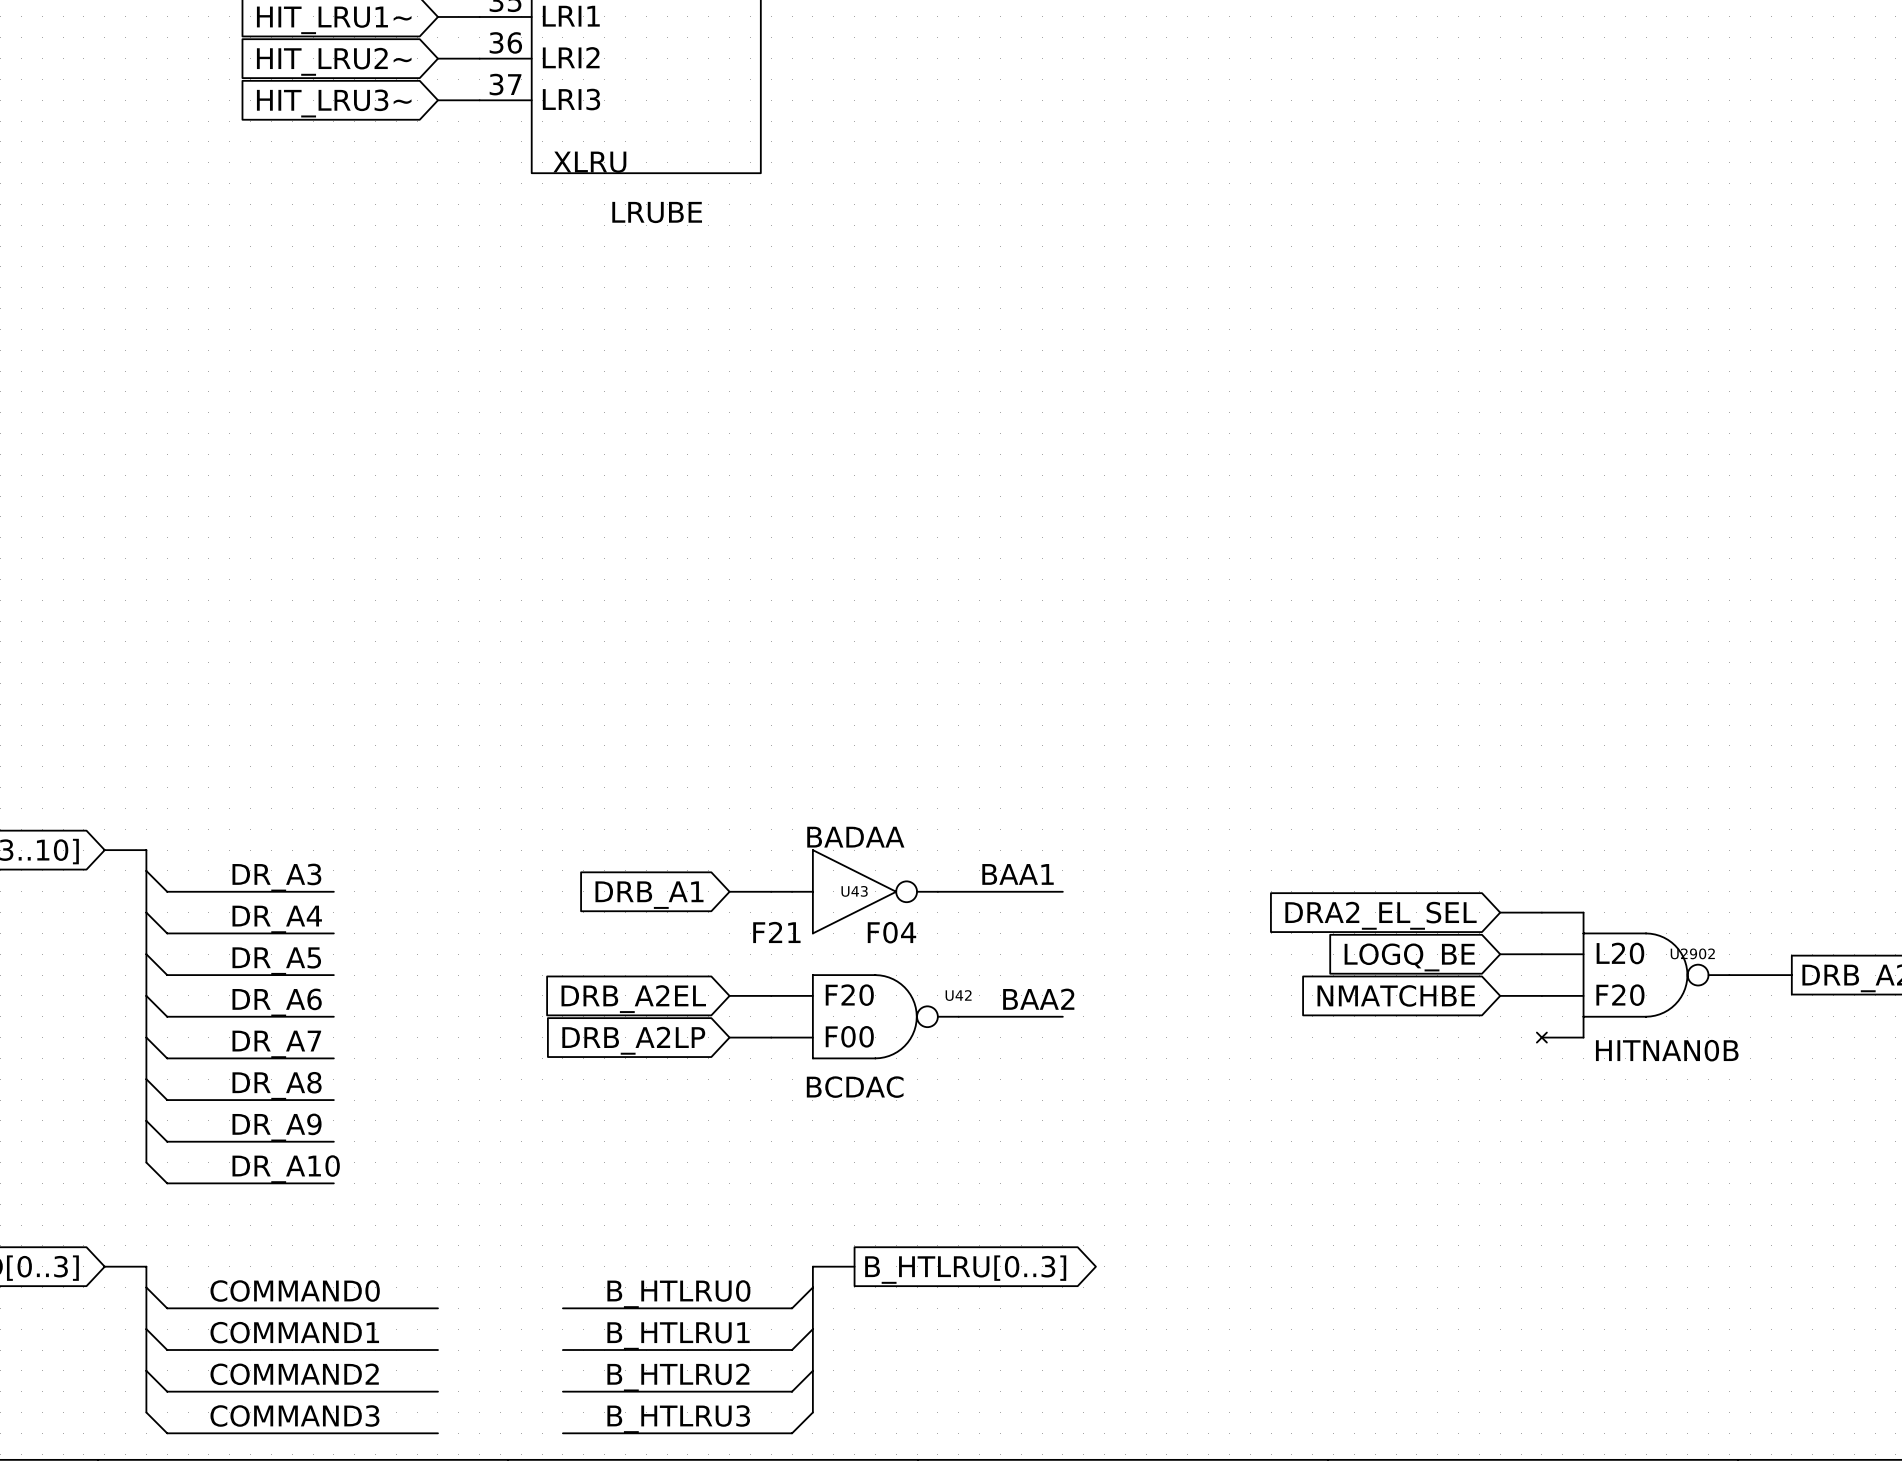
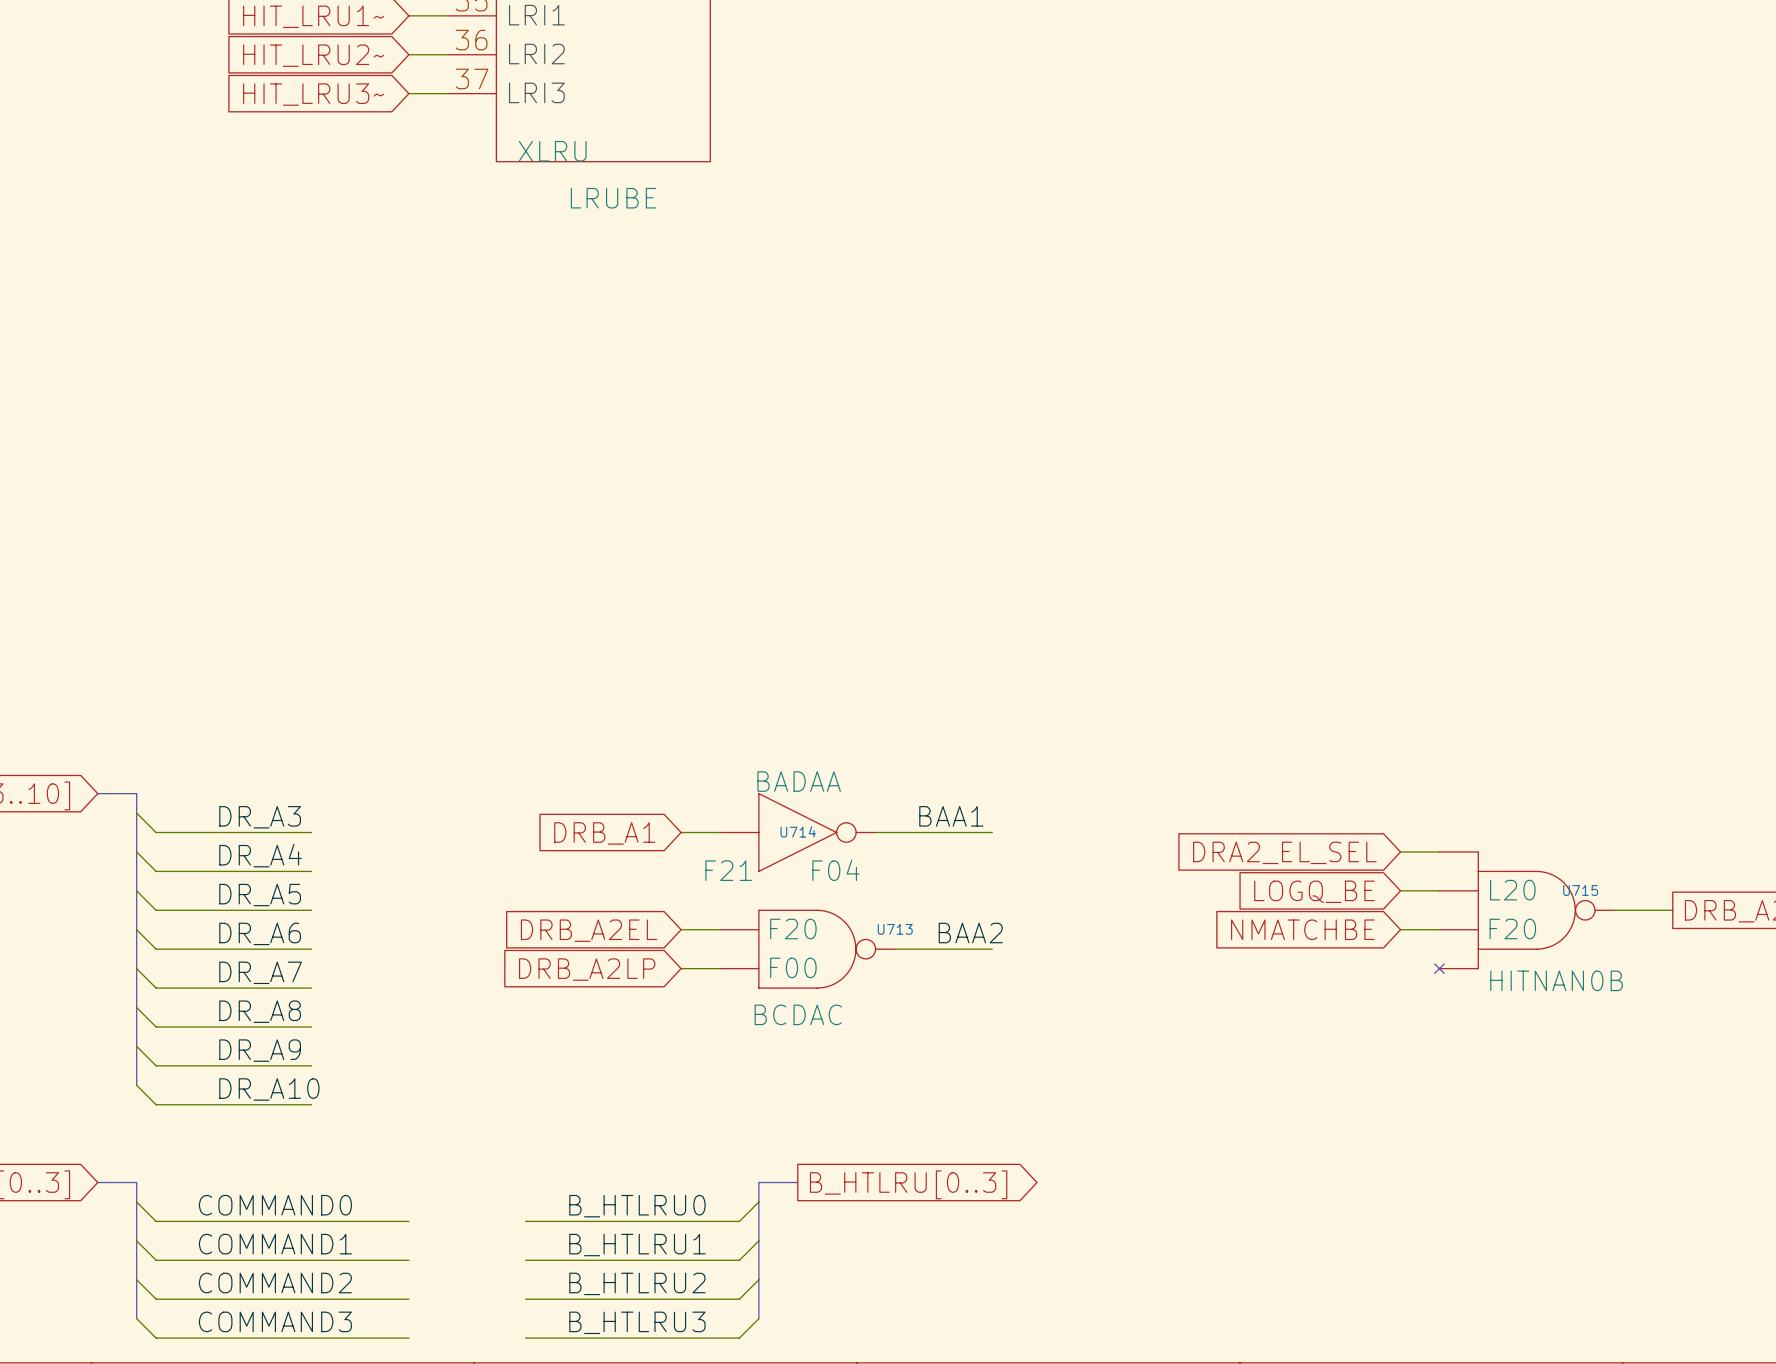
U43 name: U43 (854, 891) -> U714 (798, 831)
U2902 name: U2902 (1692, 953) -> U715 (1580, 890)
U42 name: U42 (958, 995) -> U713 (895, 929)

